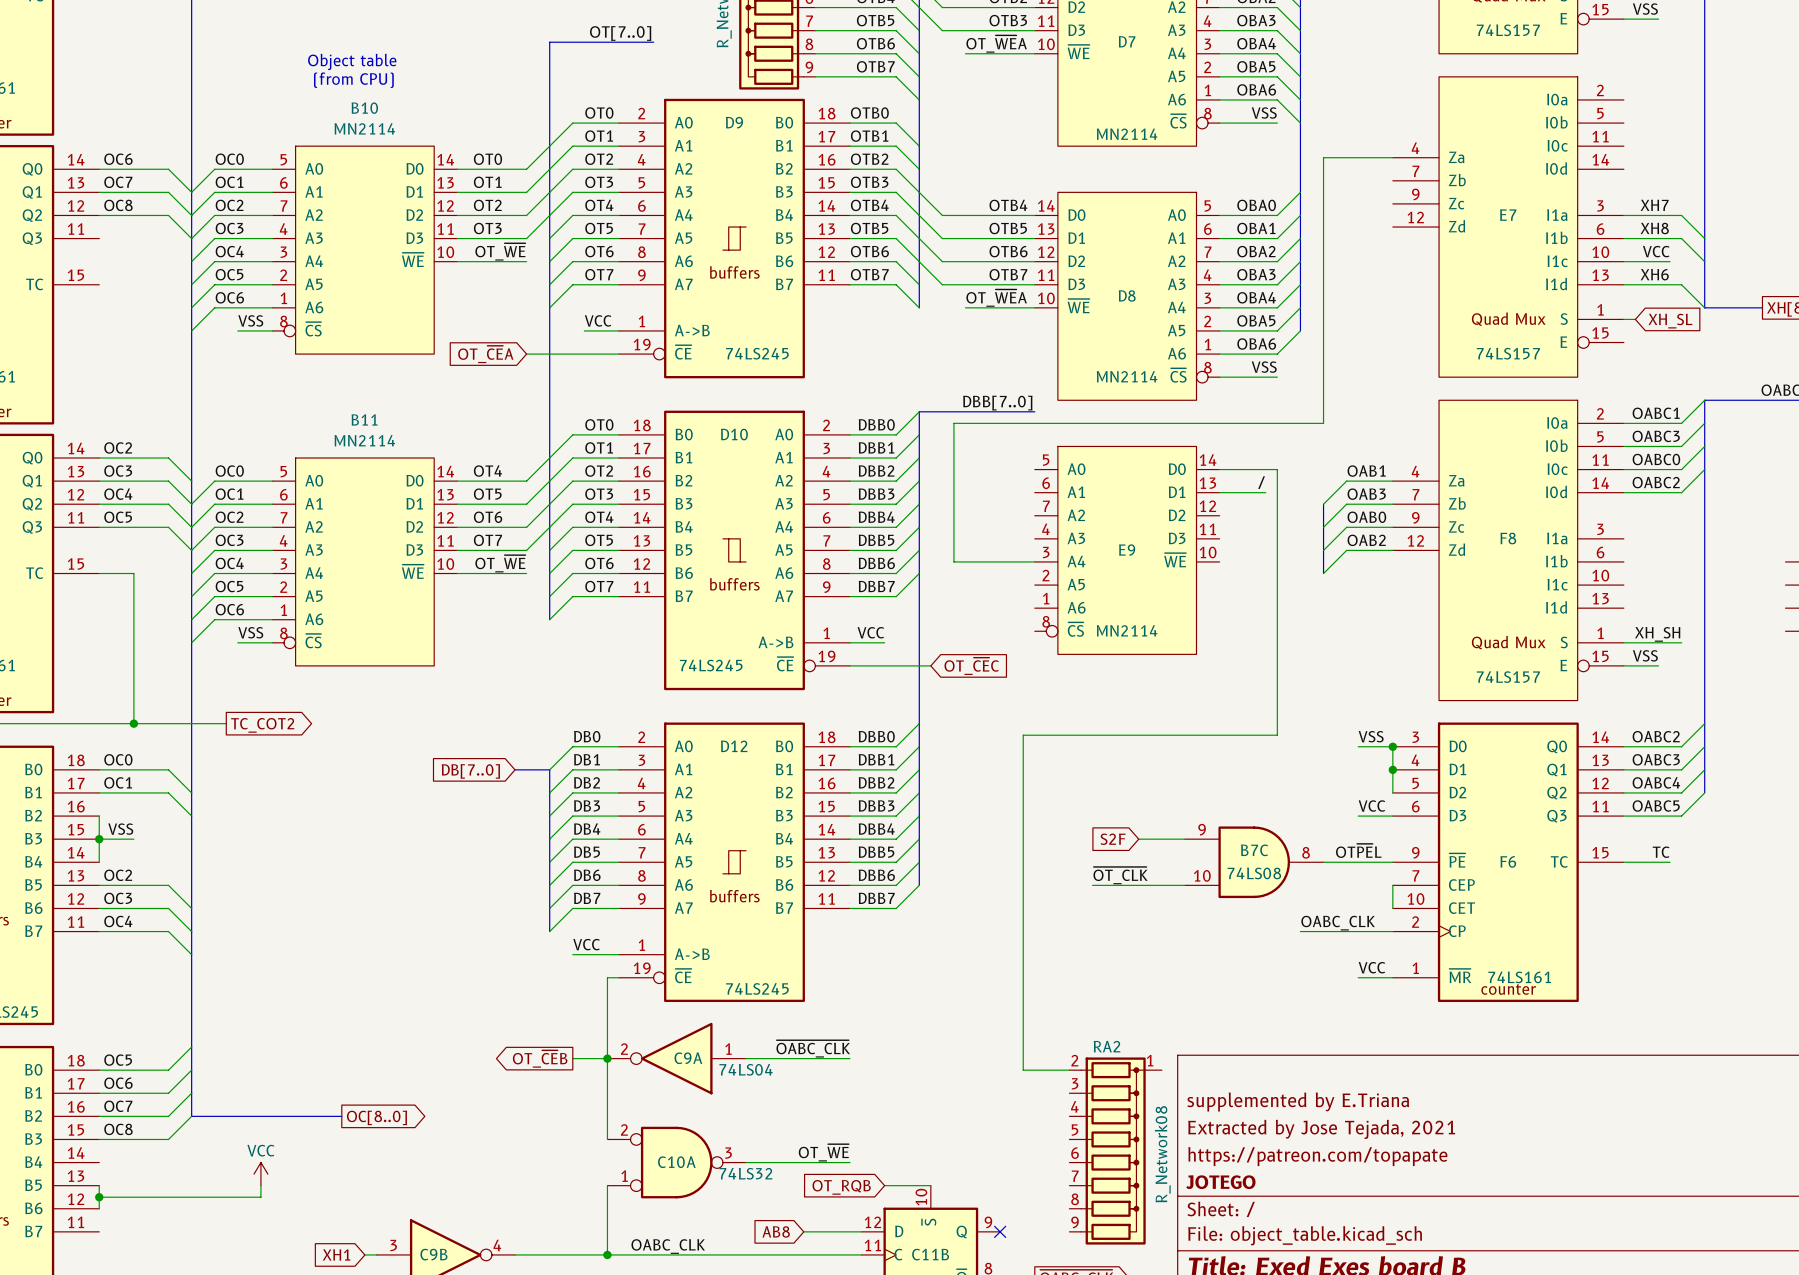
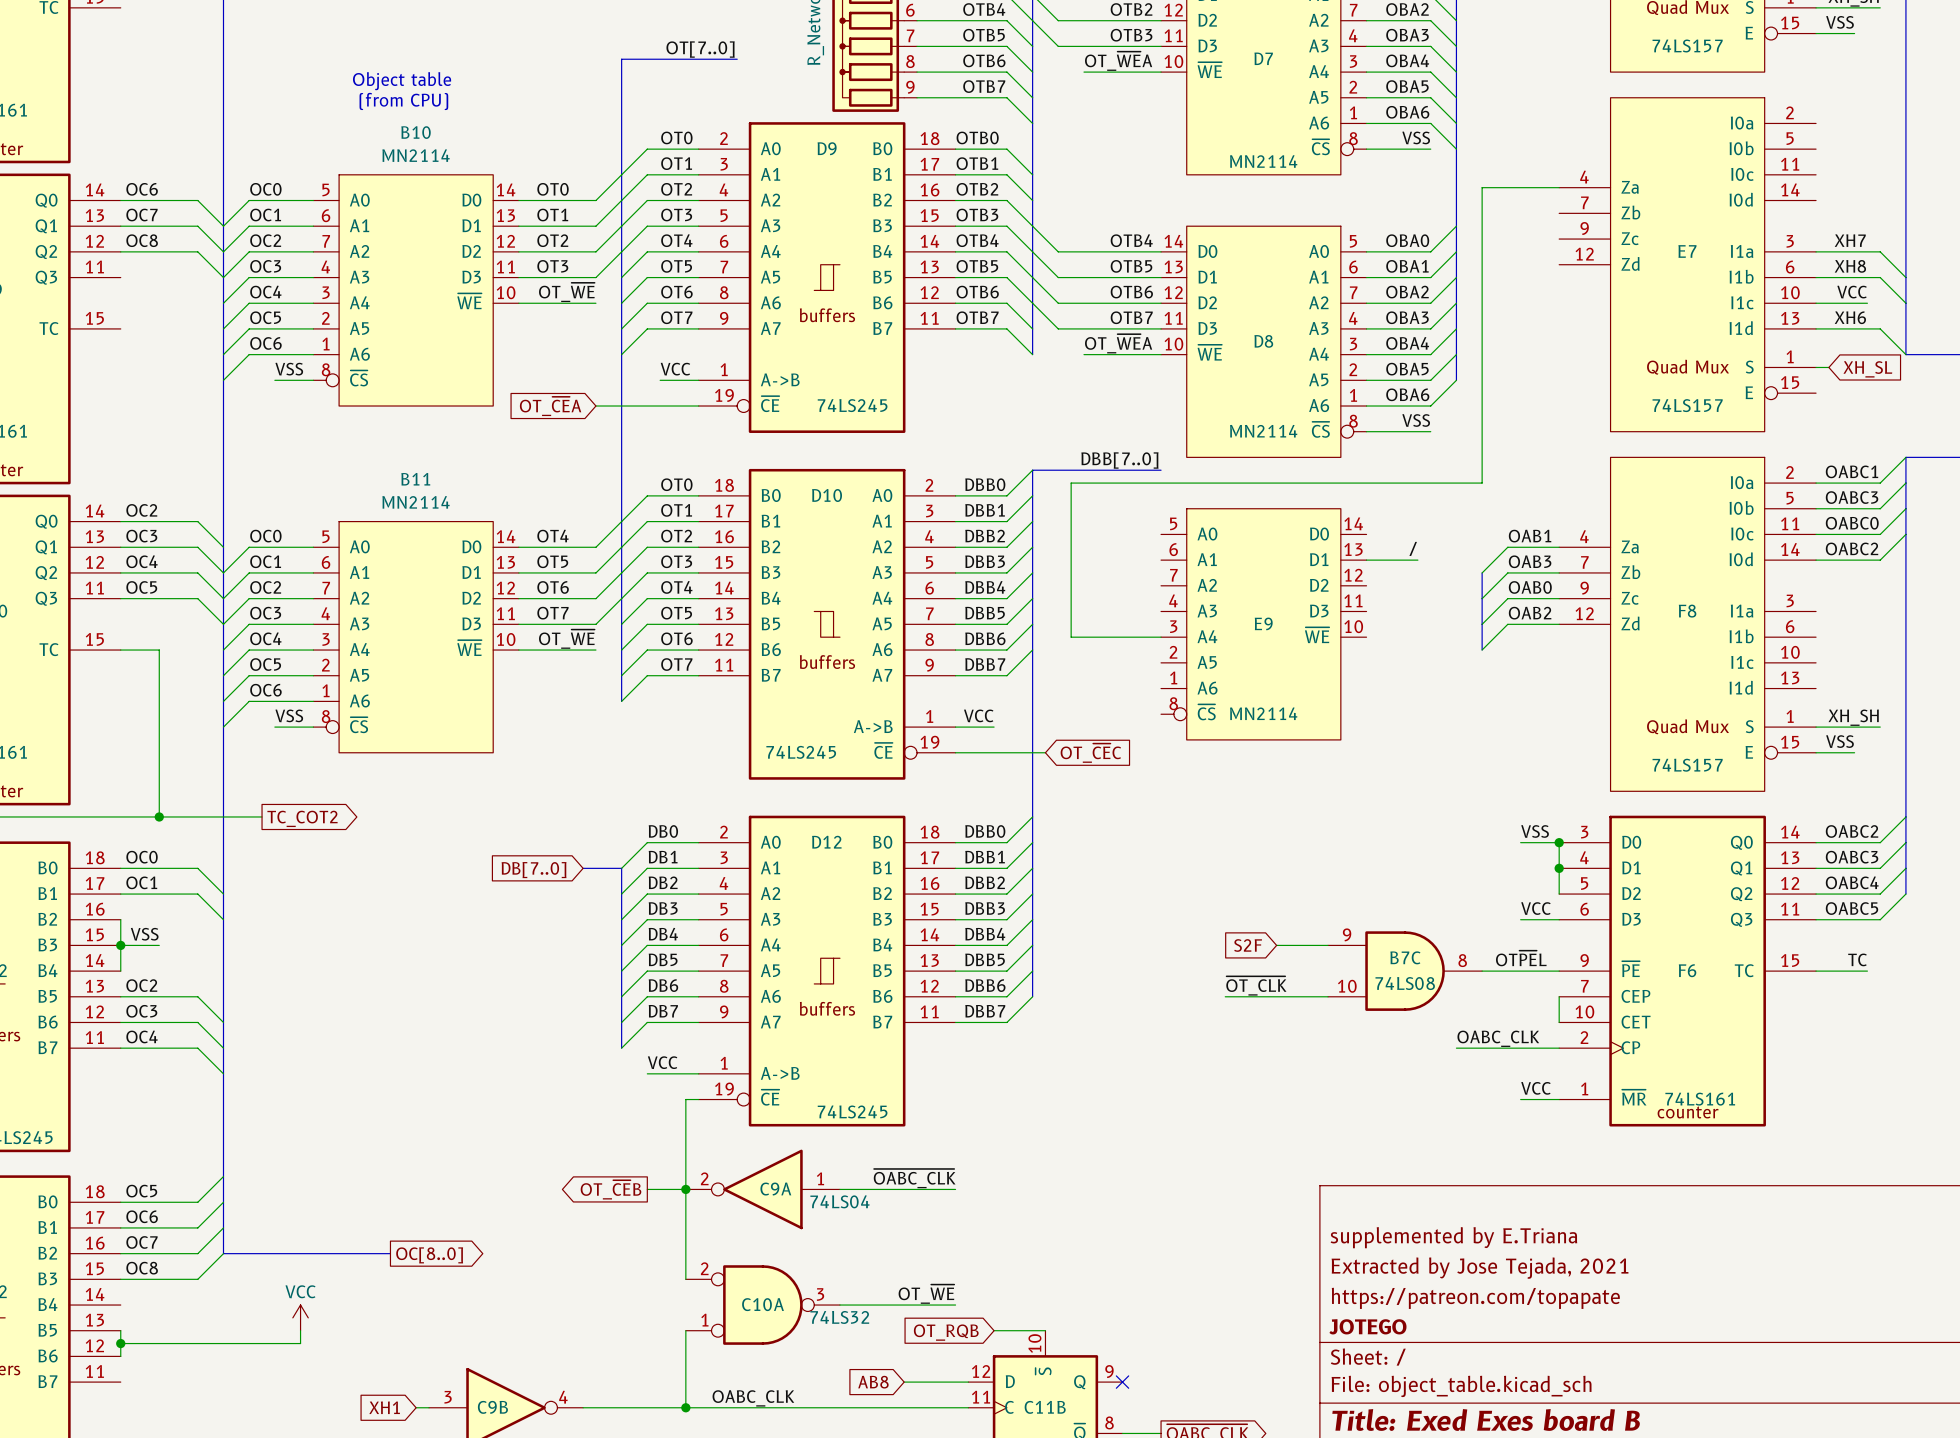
wire: (1219, 469) (1277, 469) (1277, 735) (1023, 735) (1023, 1070) (1069, 1070) -> none
RA2: R_Network08 (1115, 1151) -> none

